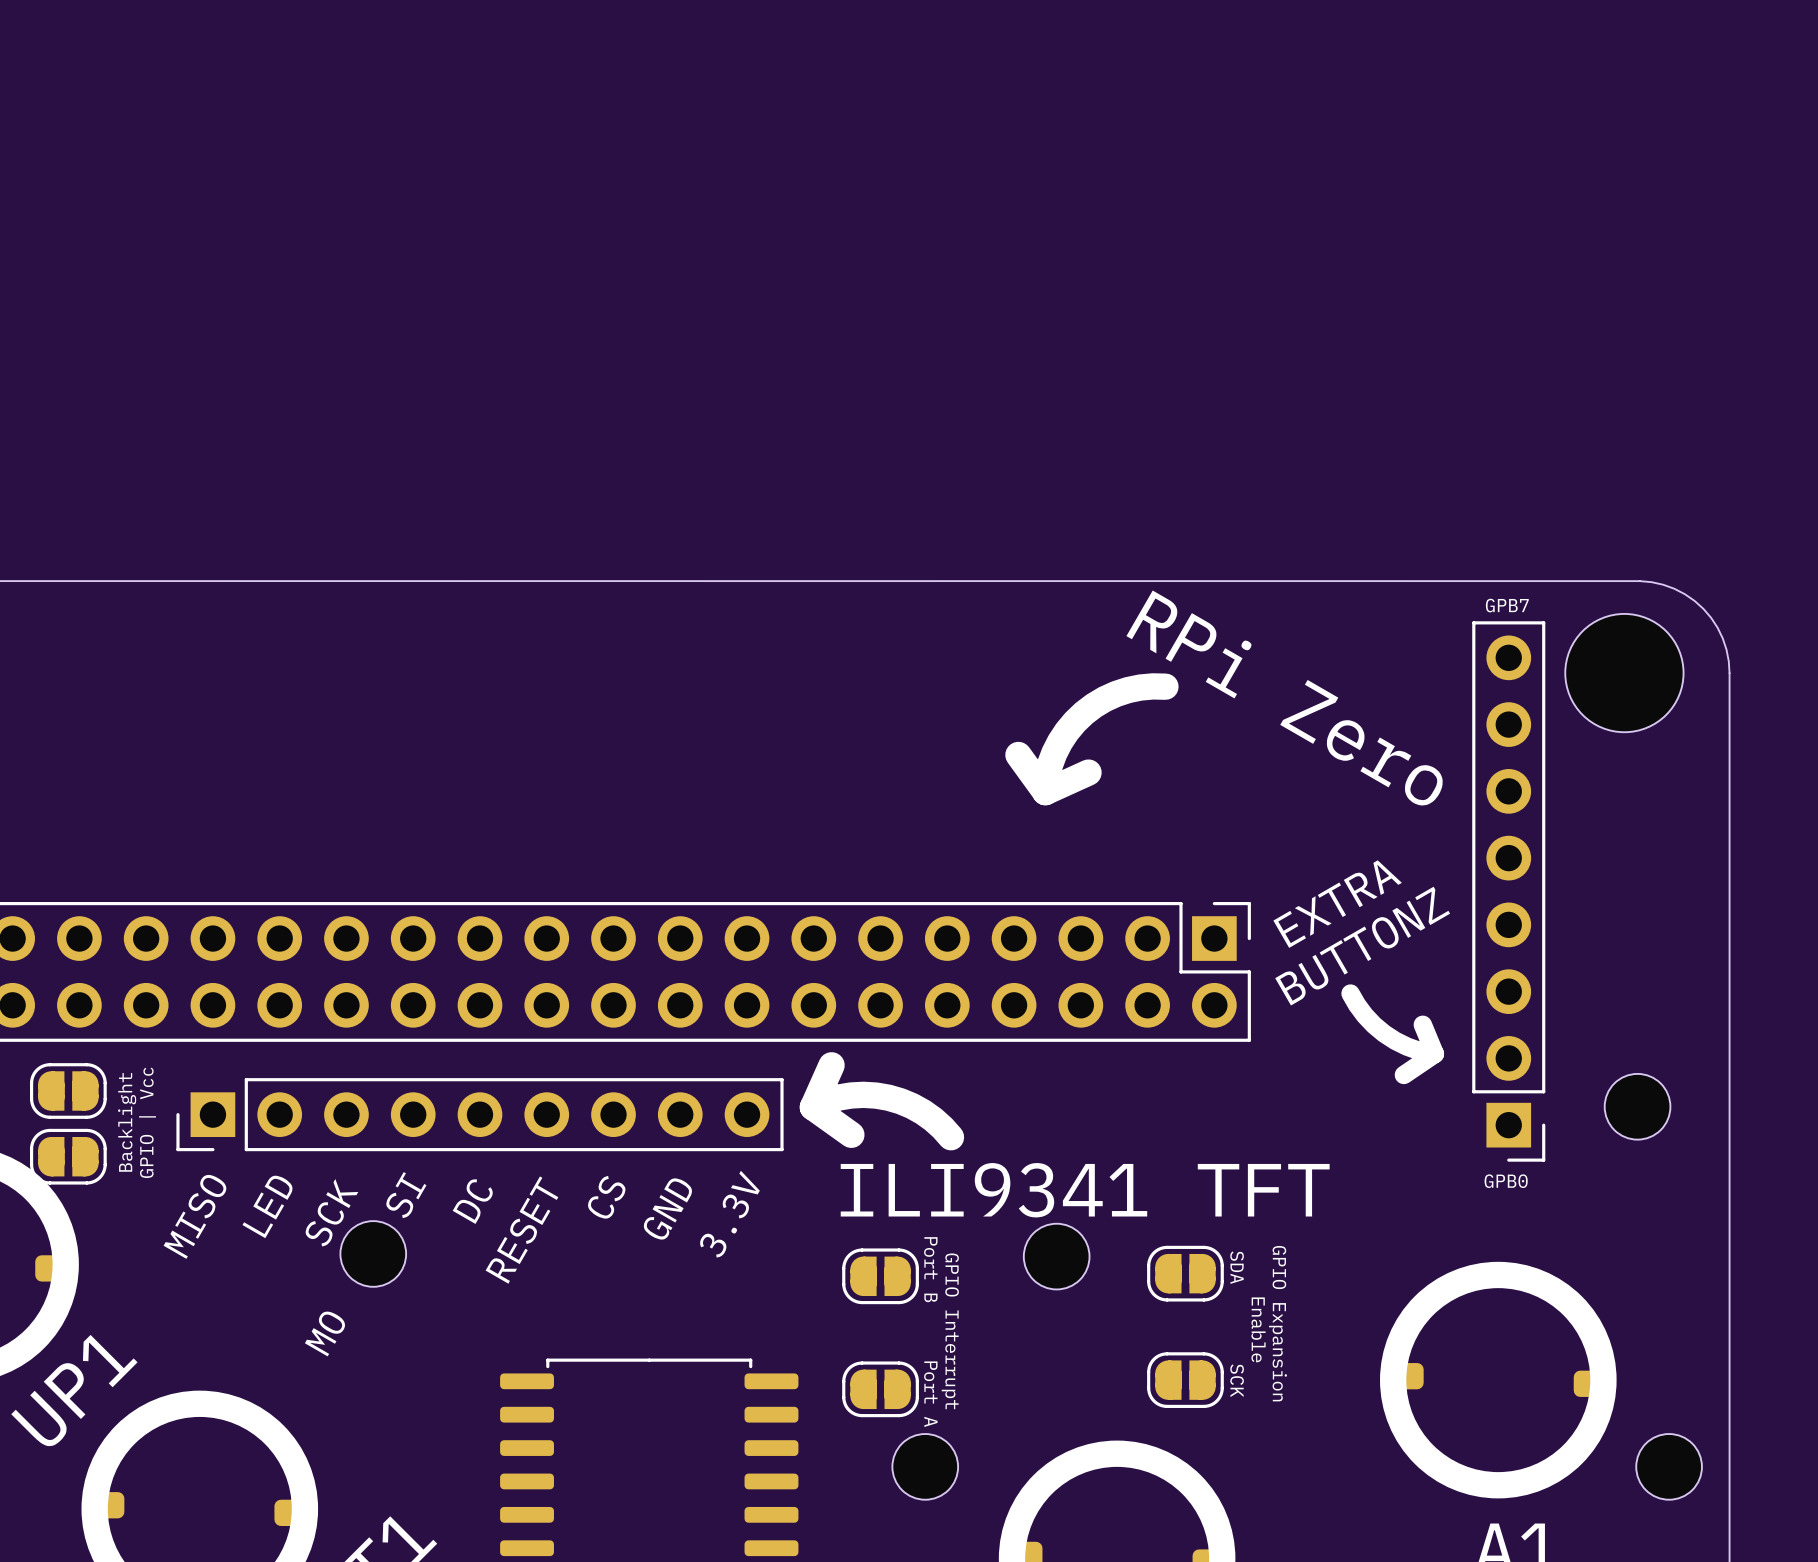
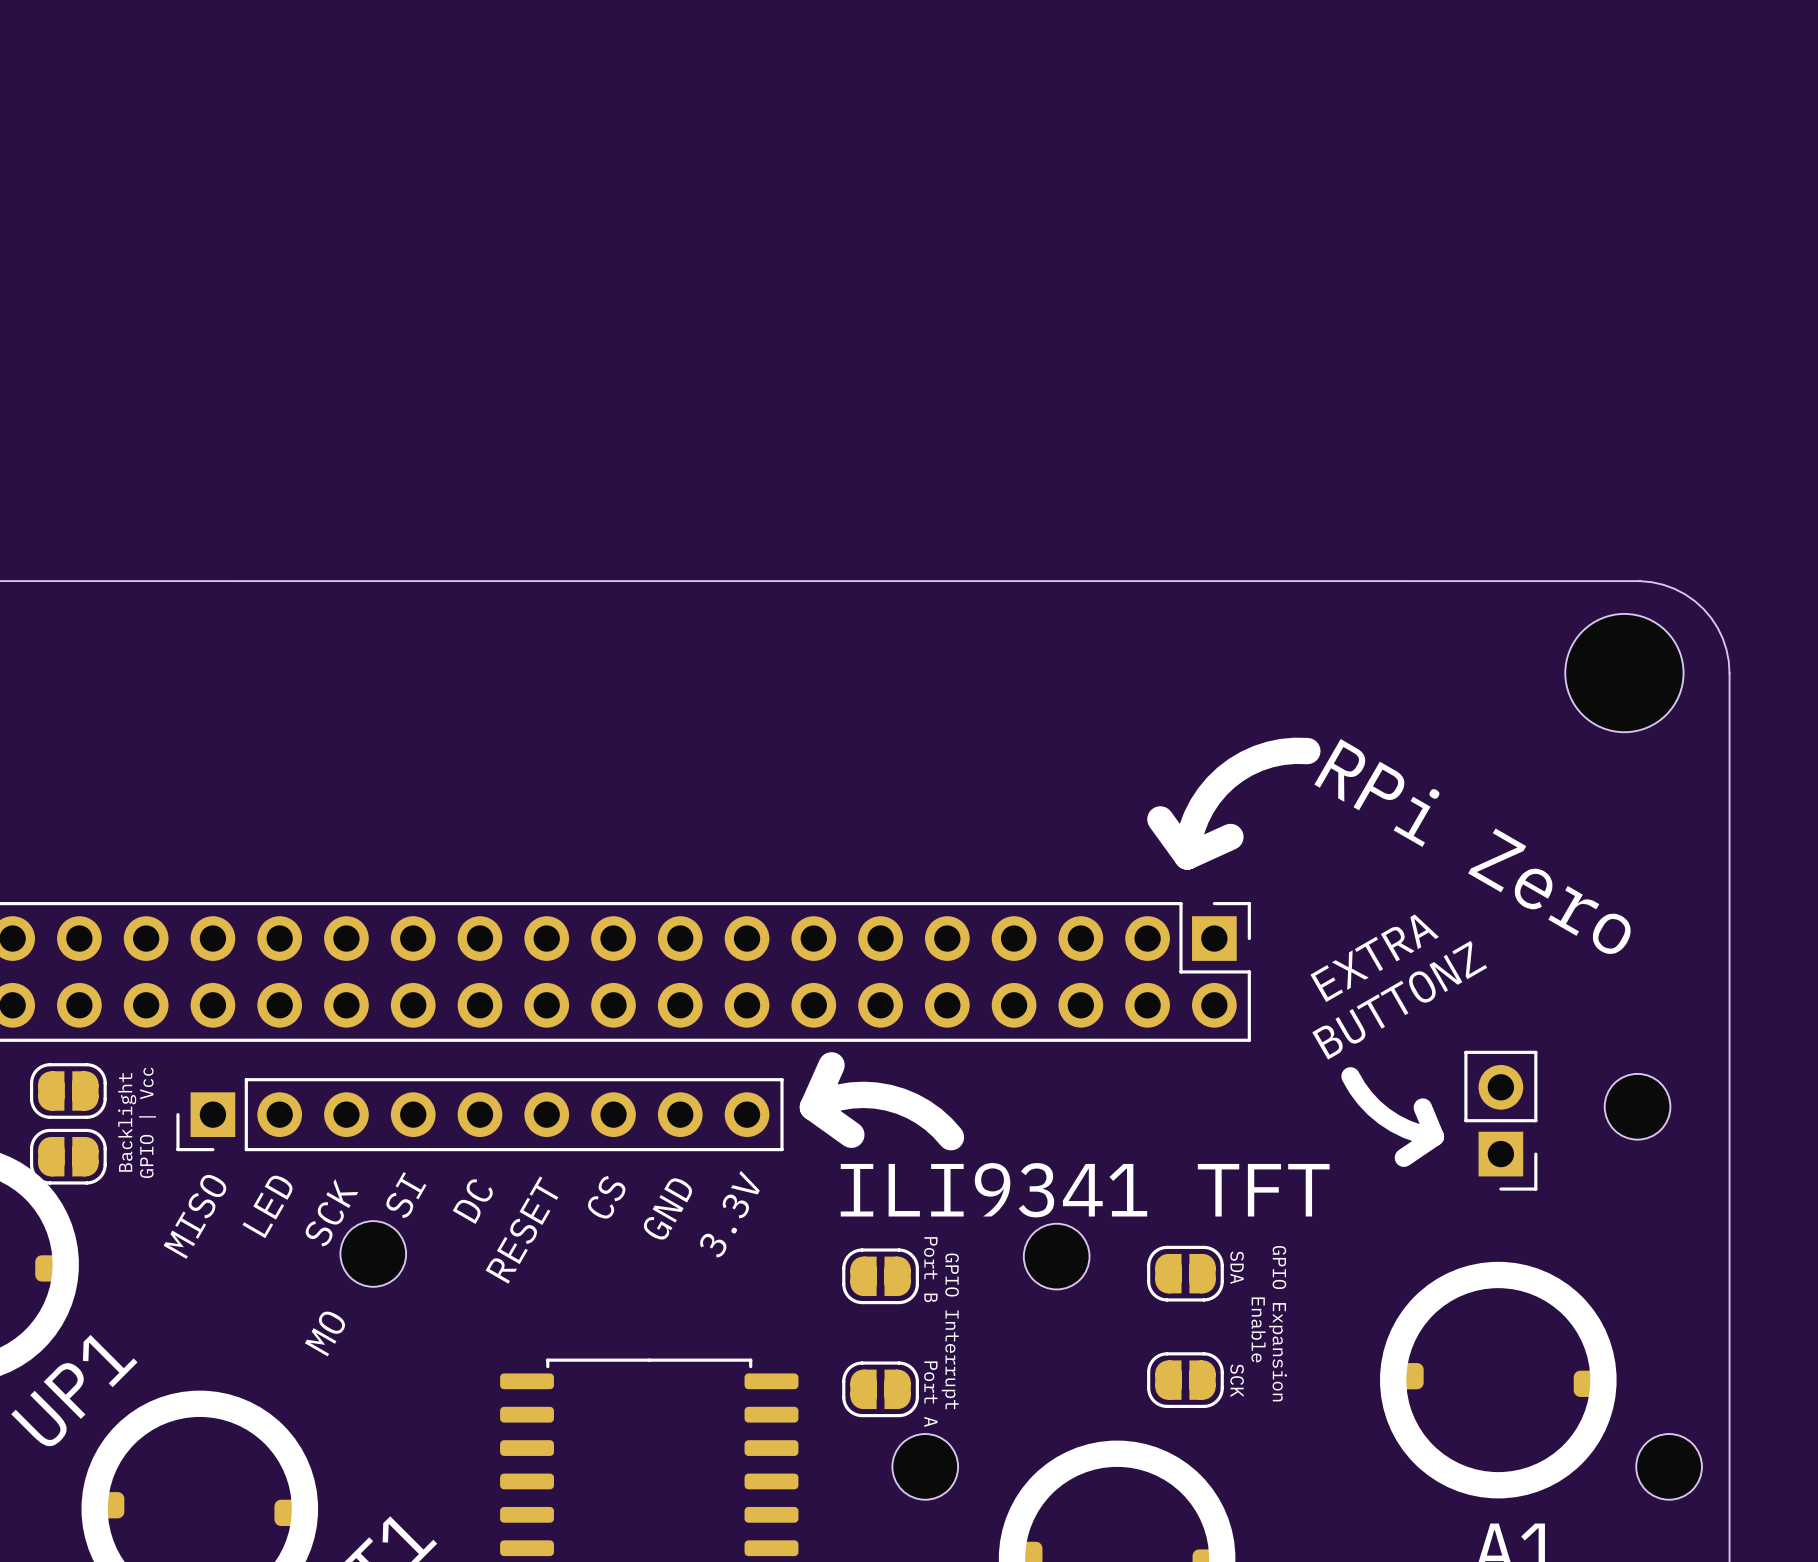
text: GPB7 (1507, 605) -> none
line: (1165, 686) (1128, 690) (1104, 699) (1084, 713) (1060, 742) (1049, 764) (1045, 789) -> (1307, 751) (1282, 751) (1258, 758) (1225, 777) (1201, 806) (1191, 829) (1187, 853)
text position: RPi Zero (1284, 698) -> RPi Zero (1472, 846)
line: (1018, 754) (1045, 792) (1088, 772) -> (1160, 819) (1187, 856) (1230, 836)
part: (1508, 891) -> none
text: EXTRA (1337, 904) -> none
text: BUTTONZ (1362, 946) -> EXTRA (1374, 958)
line: (1350, 993) (1364, 1015) (1384, 1033) (1407, 1046) (1432, 1053) -> (1350, 1076) (1364, 1098) (1384, 1116) (1407, 1129) (1432, 1136)
text: none -> BUTTONZ (1399, 1000)
line: (1422, 1024) (1434, 1053) (1403, 1074) -> (1422, 1107) (1434, 1136) (1403, 1157)
part: none -> (1500, 1120)
text: GPB0 (1506, 1181) -> none

